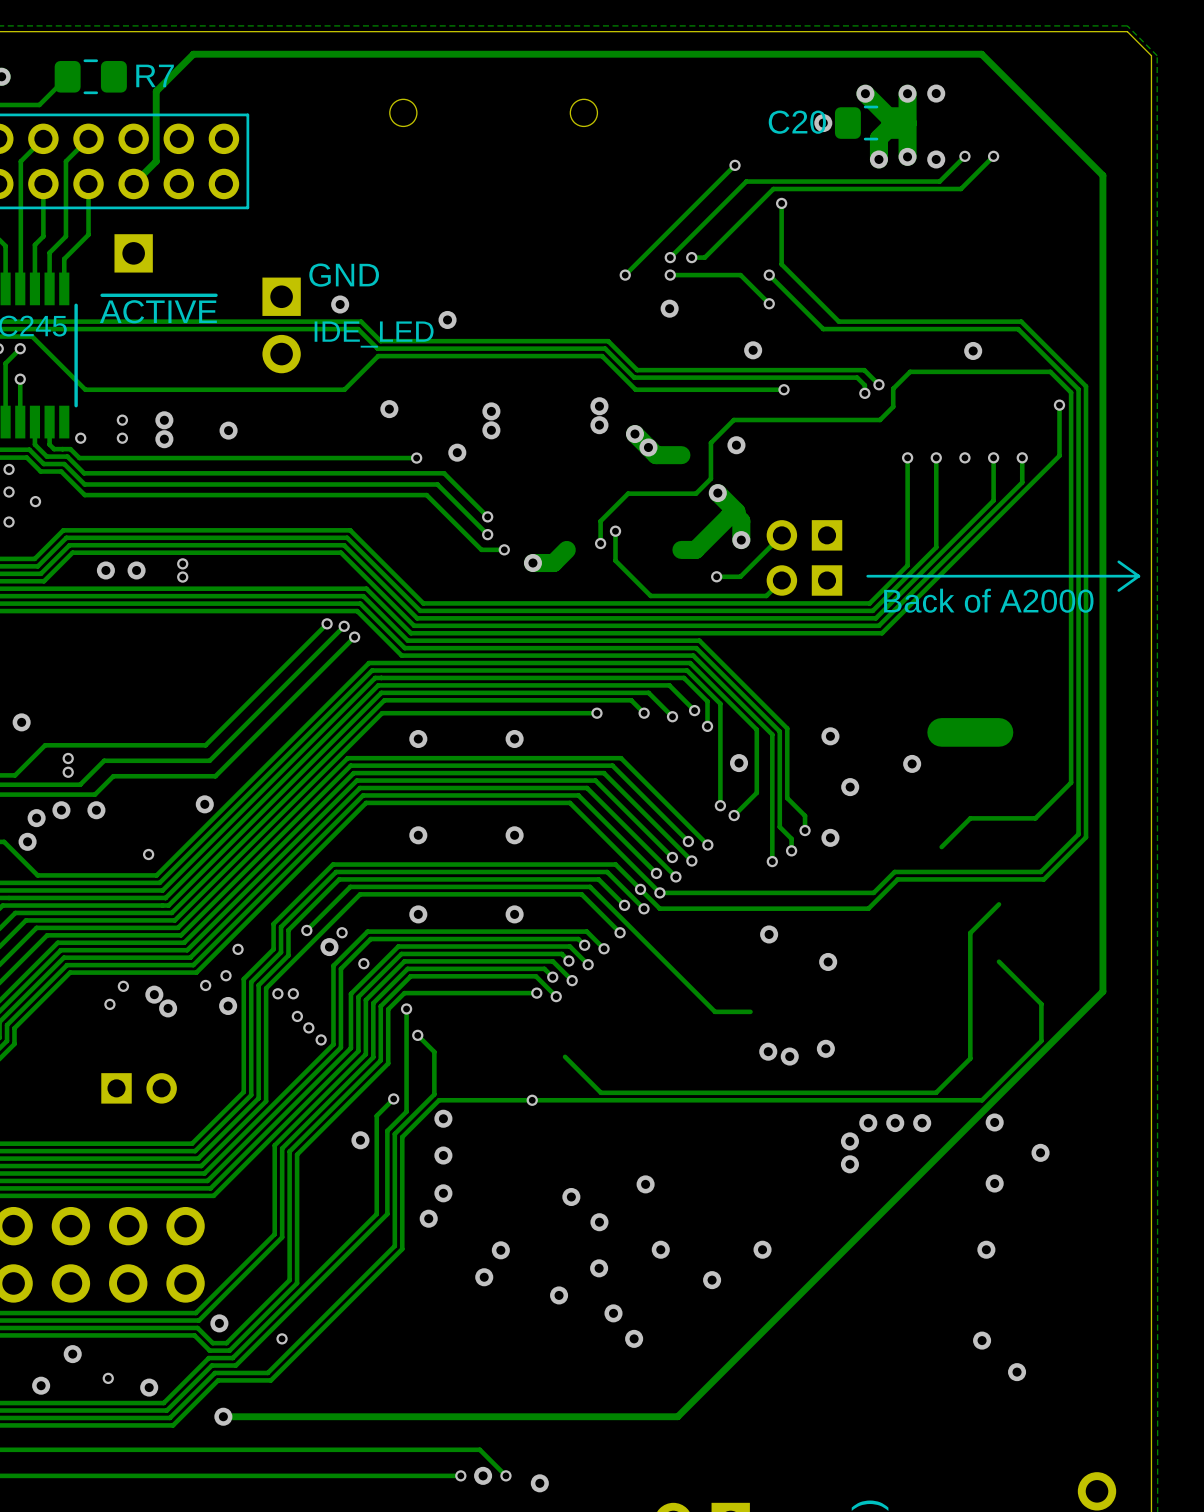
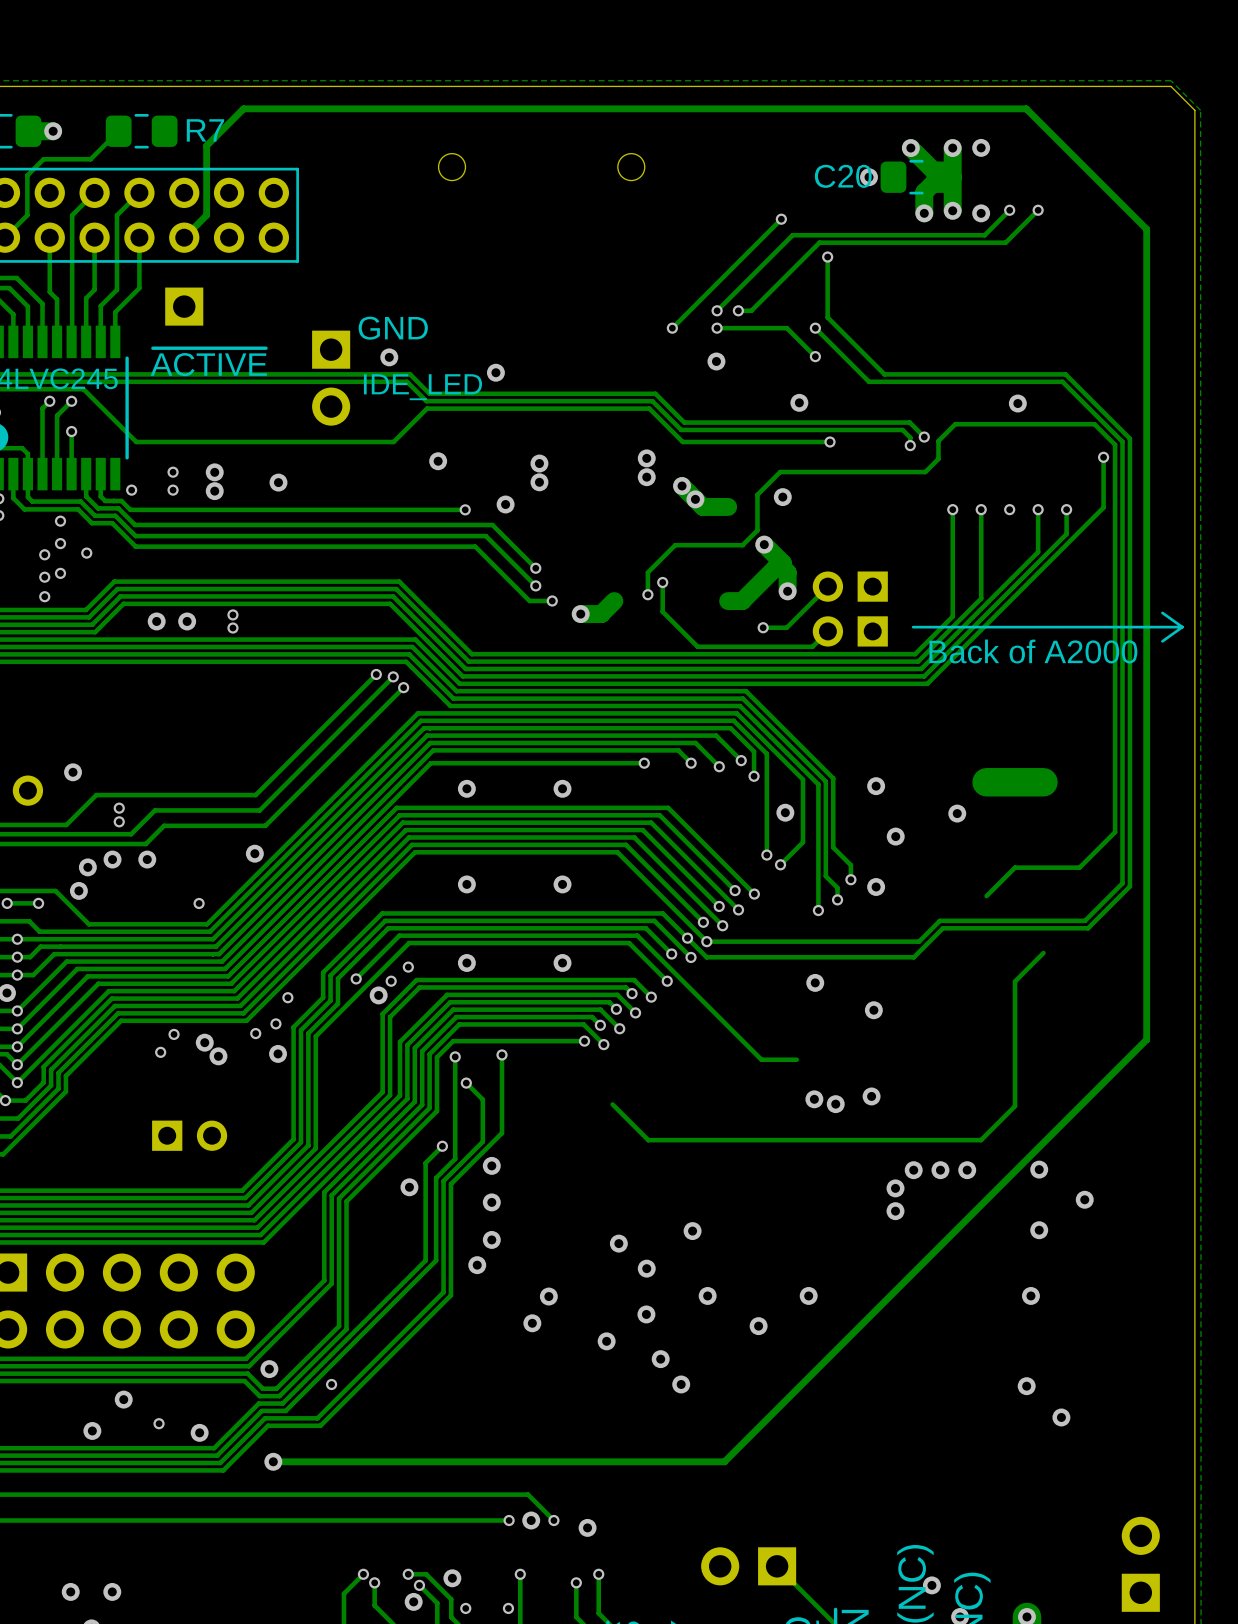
track: (998, 961) (1041, 1004) (1041, 1040) (982, 1100) (439, 1100) -> (502, 1054) (502, 1133) (487, 1147)
via position: (363, 963) -> (408, 967)
via: (277, 993) -> none
via: (293, 993) -> none
via: none -> (502, 1054)
via: (297, 1016) -> none
via: (308, 1027) -> none
via: (321, 1039) -> none
via: (532, 1100) -> none

